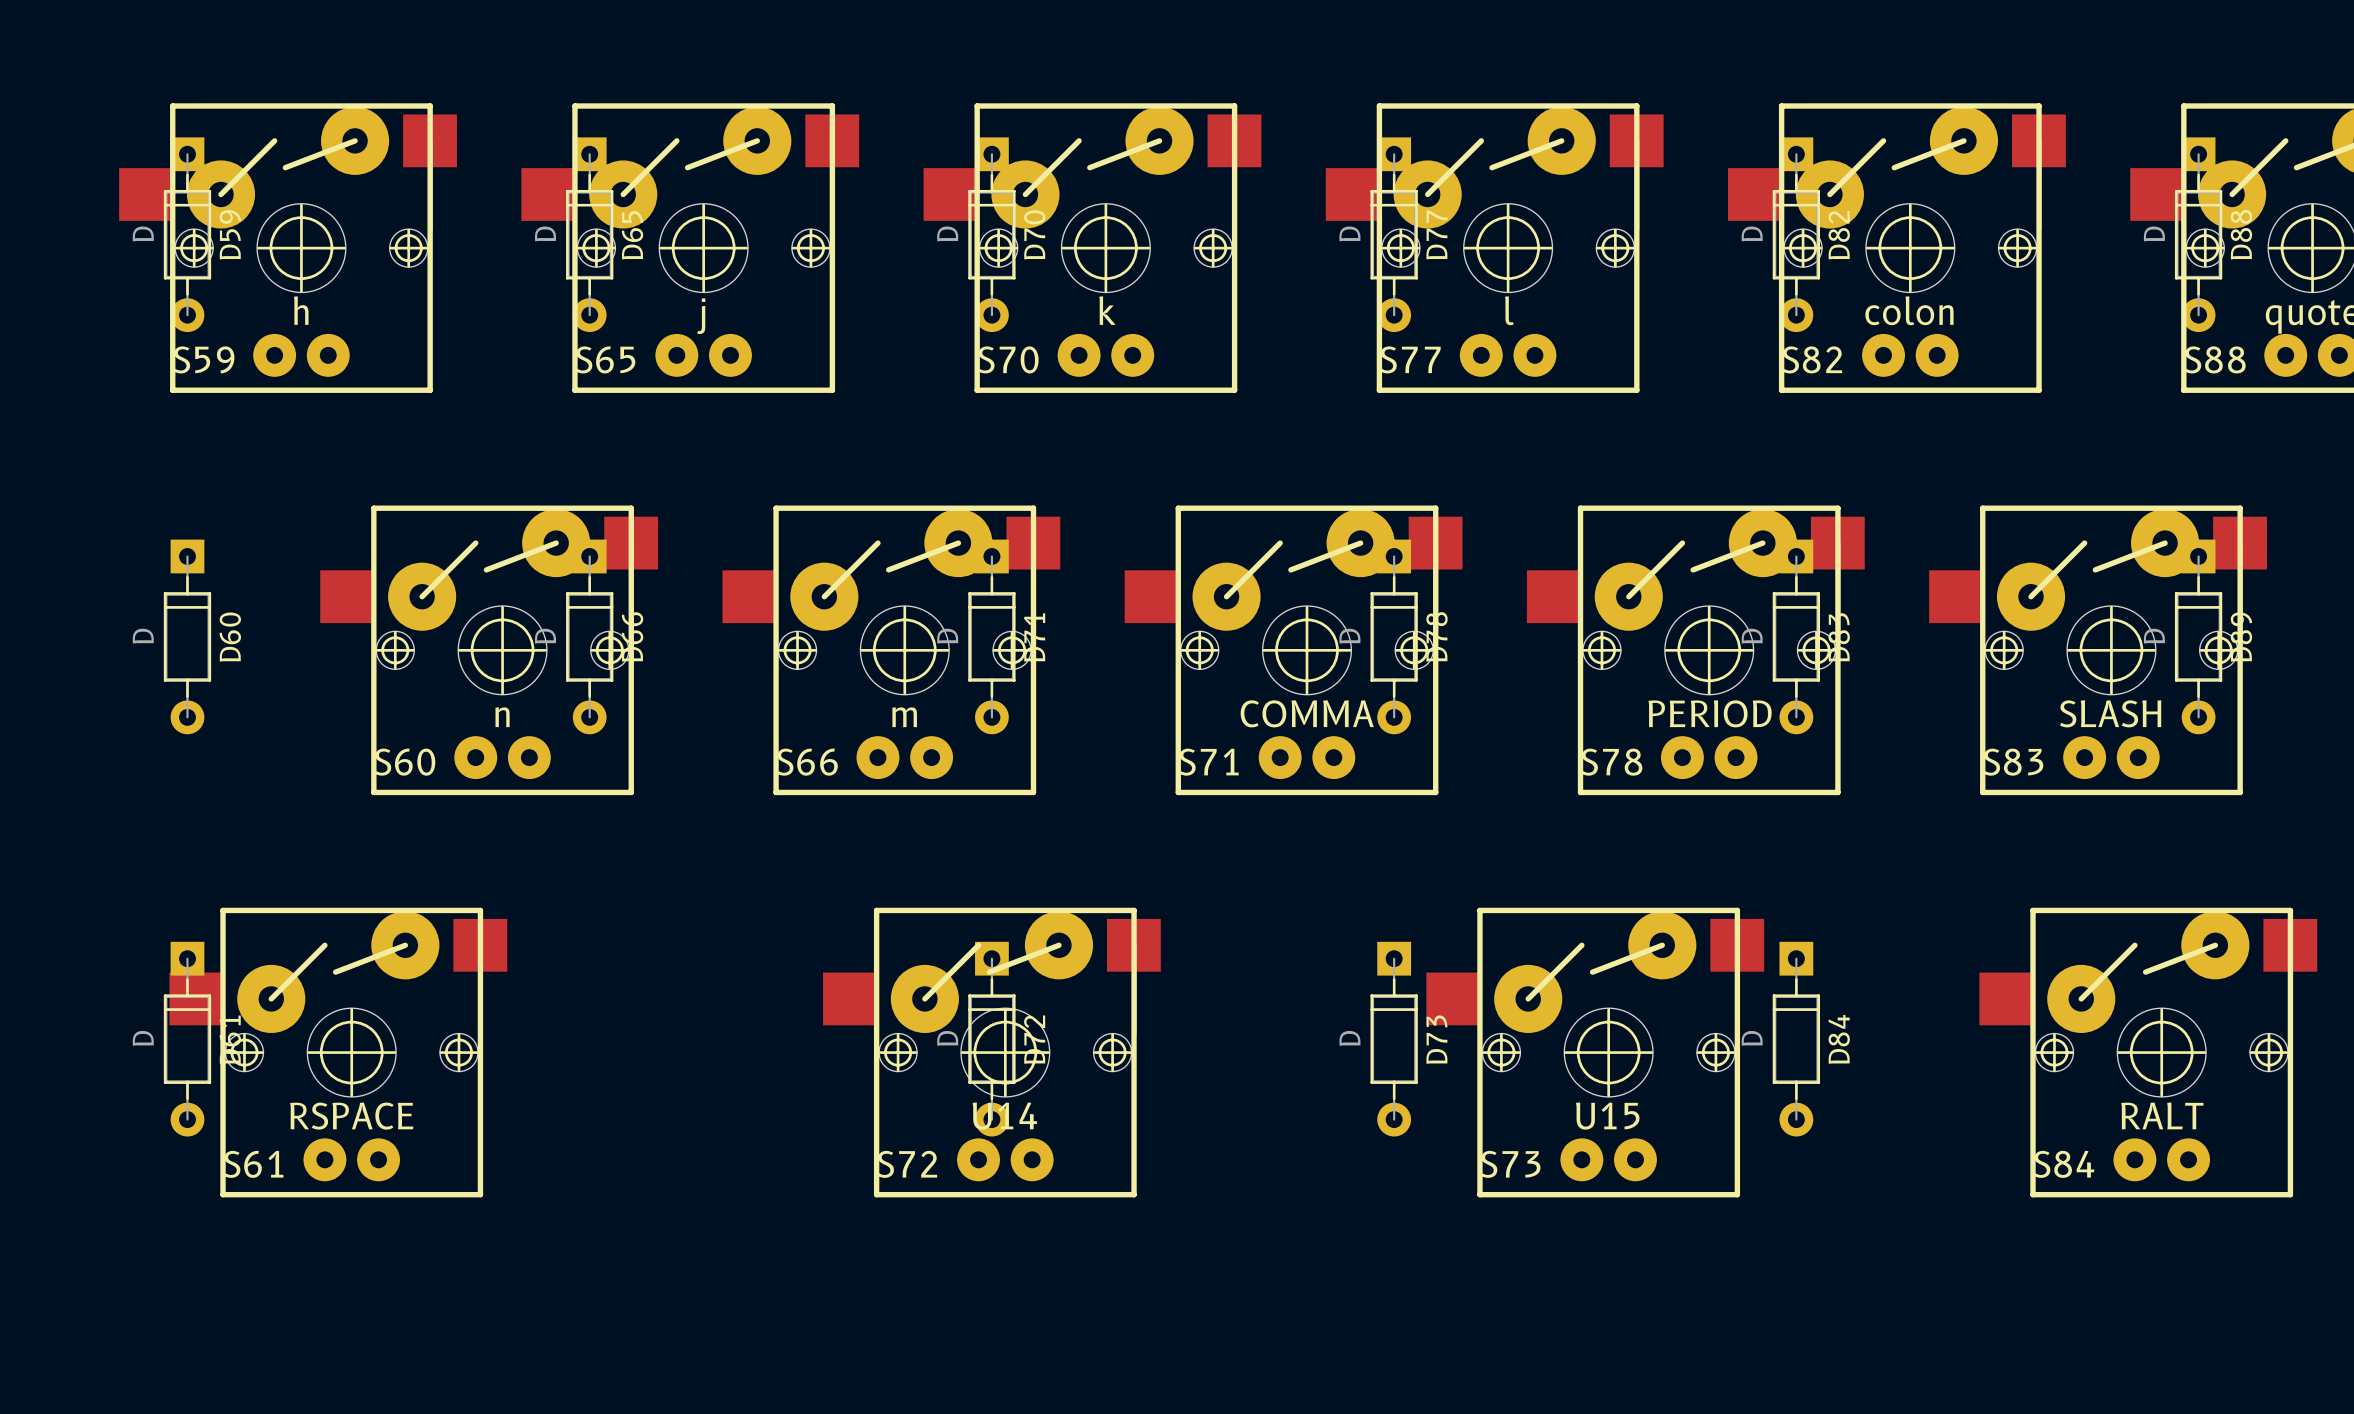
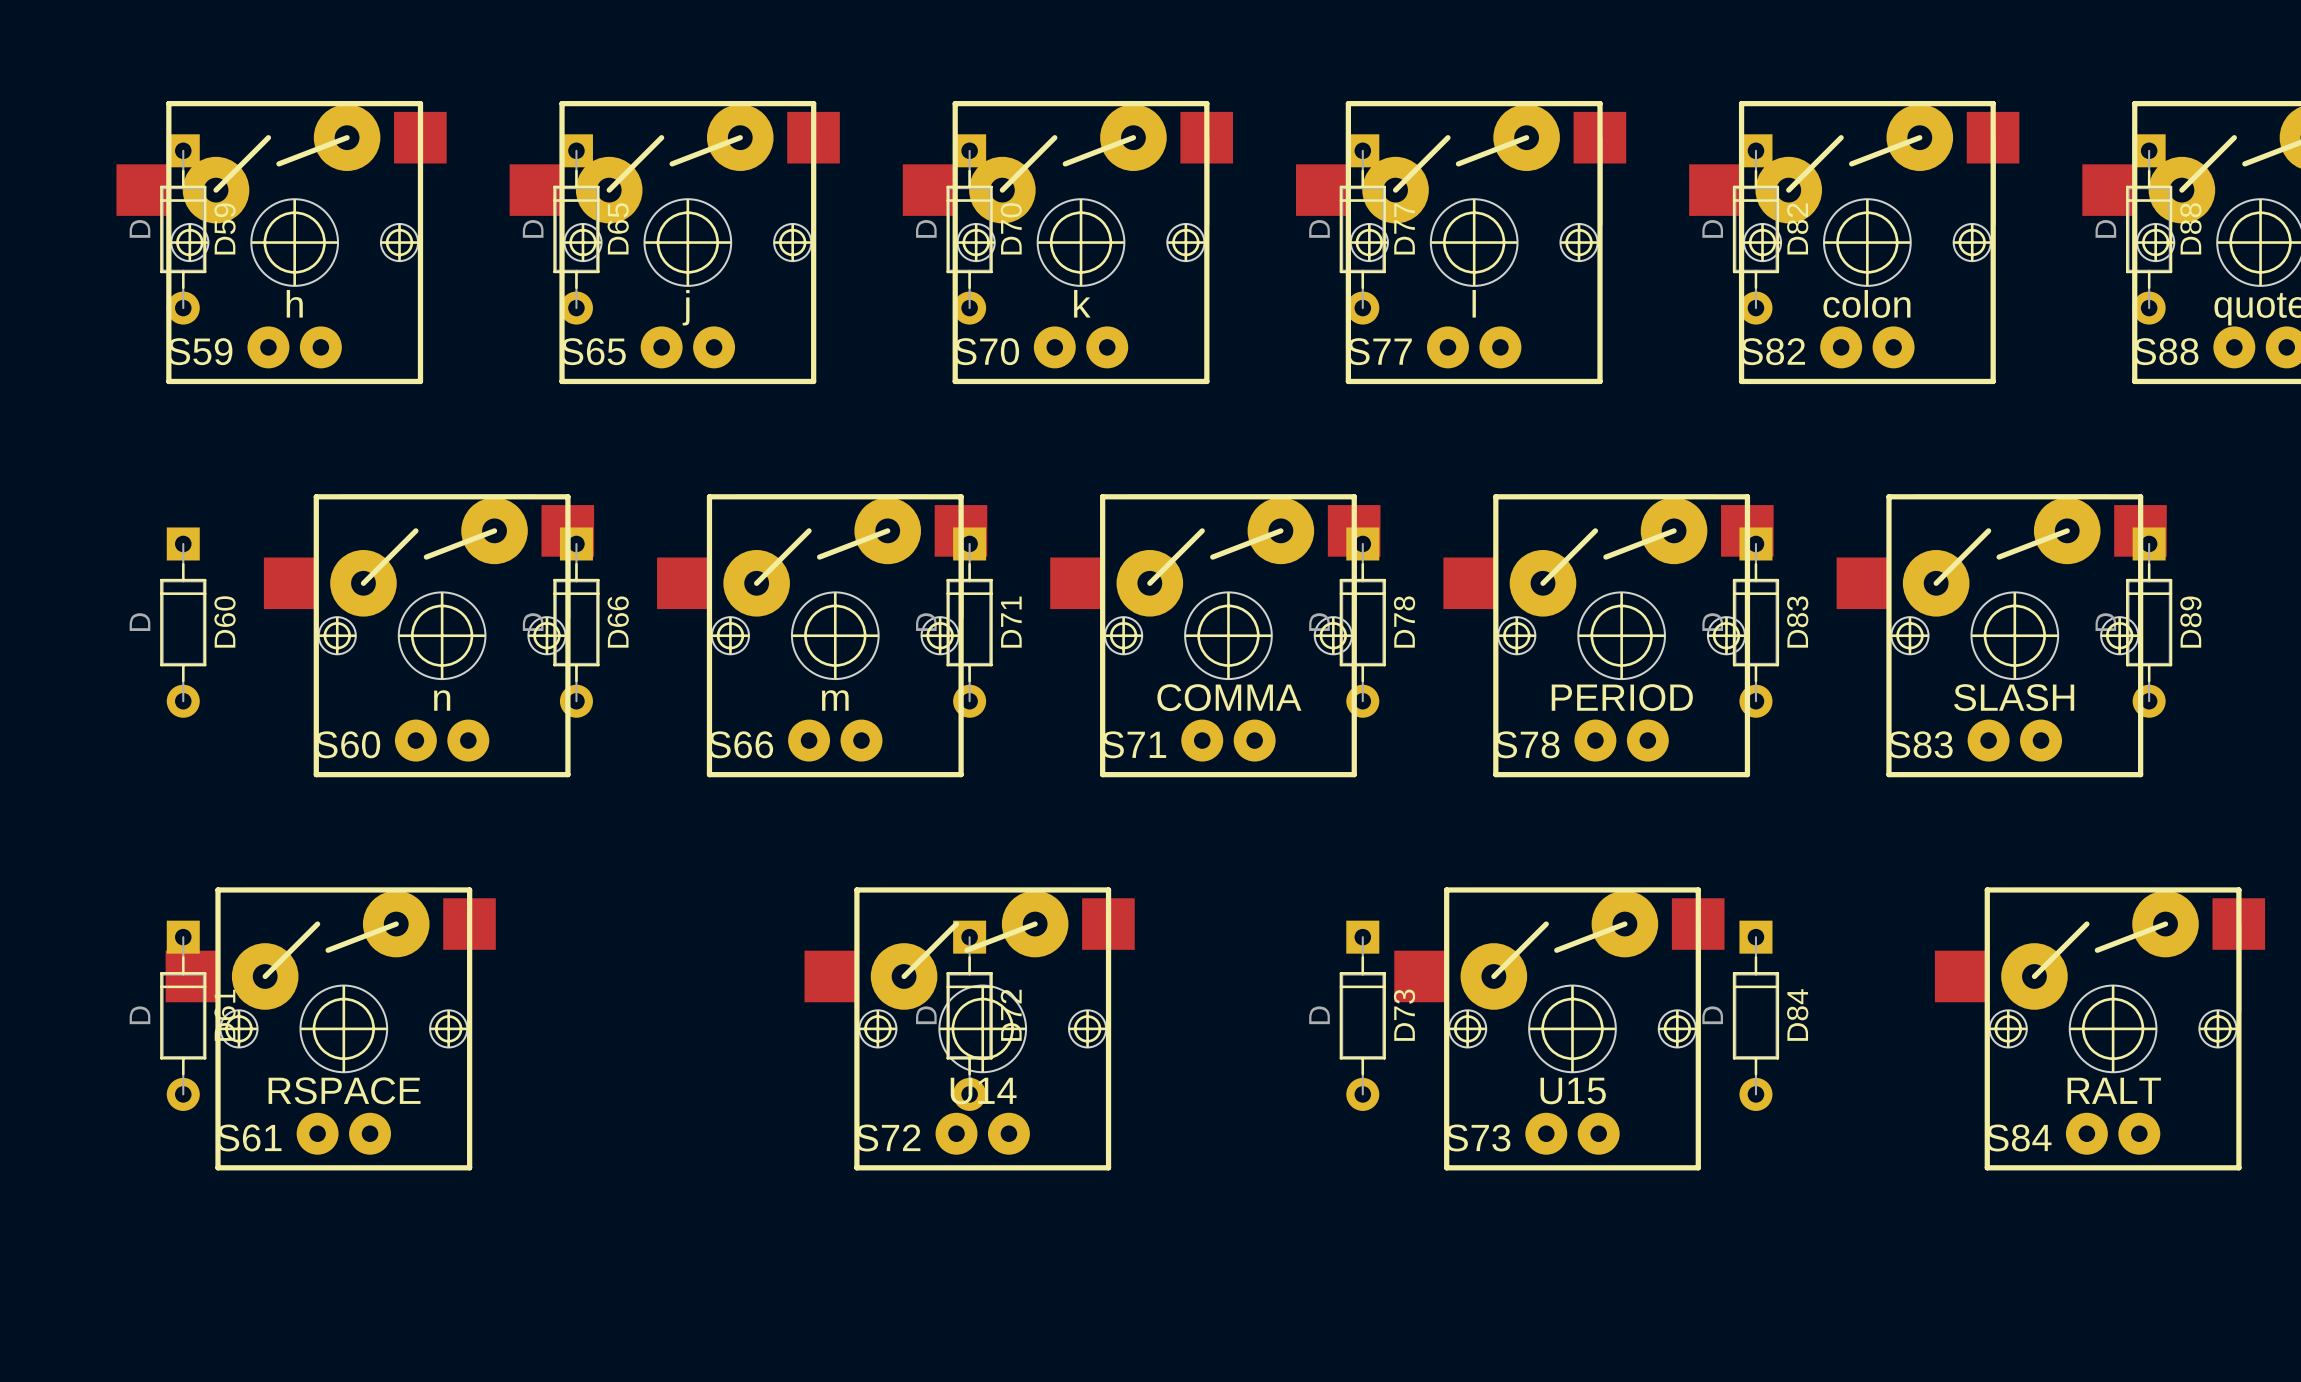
S66 footprint: [722, 505, 1061, 796] -> [657, 494, 988, 778]
S60 position: (489, 650) -> (429, 635)
S71 position: (1293, 650) -> (1215, 635)
S78 position: (1695, 650) -> (1608, 635)
S83 position: (2098, 650) -> (2001, 635)

